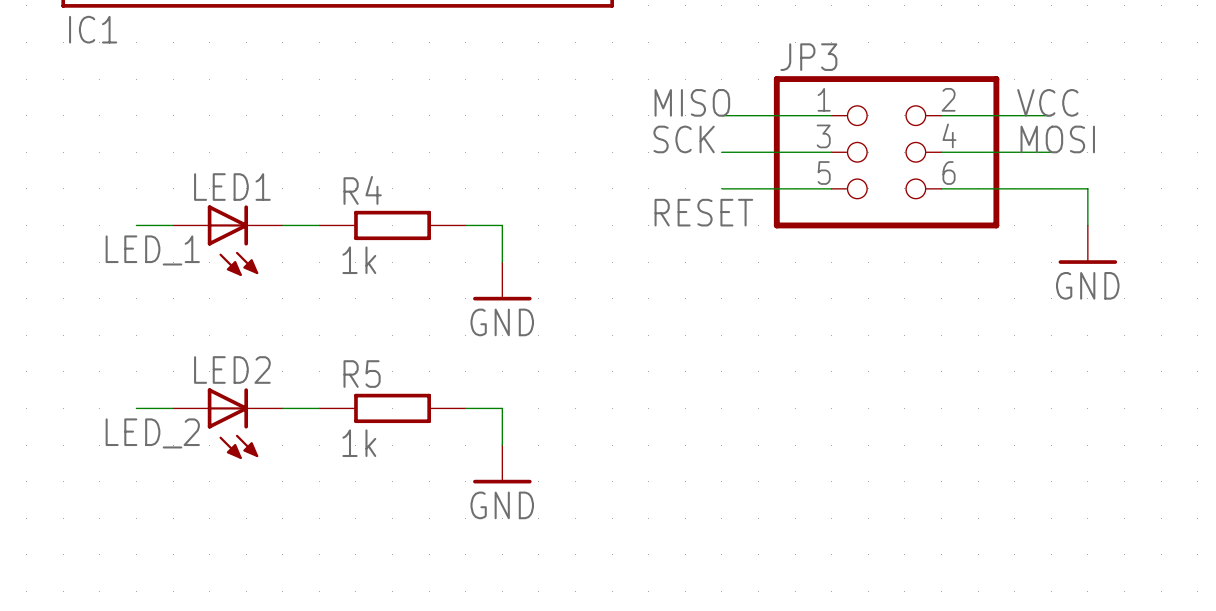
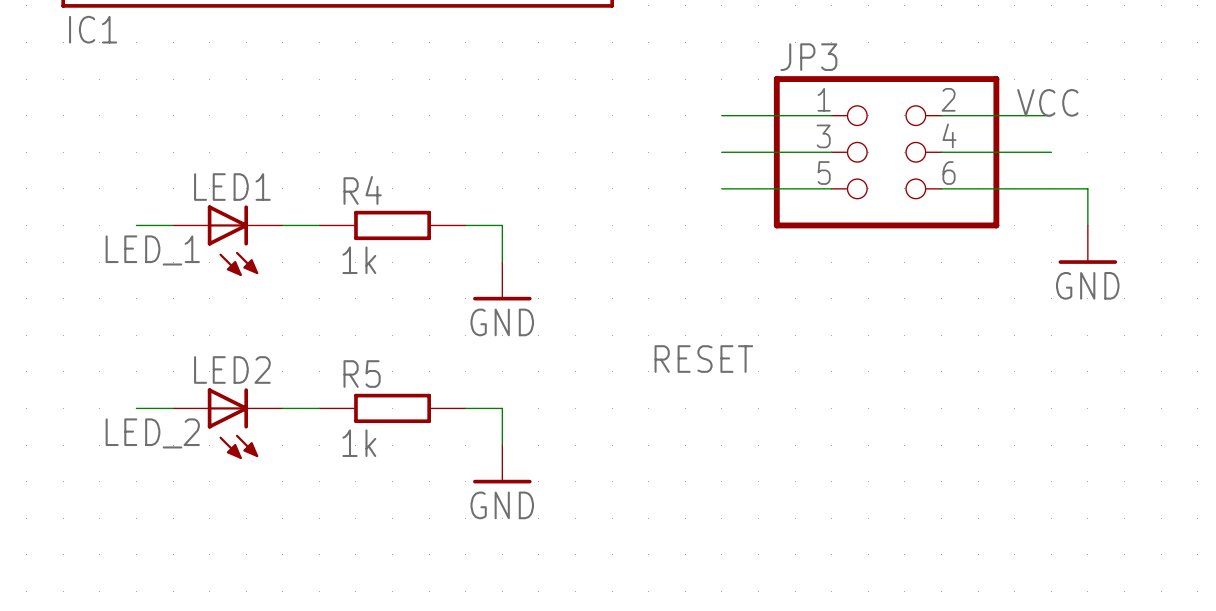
label: MISO (692, 102) -> none
label: SCK (684, 139) -> none
label: MOSI (1057, 139) -> none
label position: RESET (703, 212) -> RESET (703, 359)

